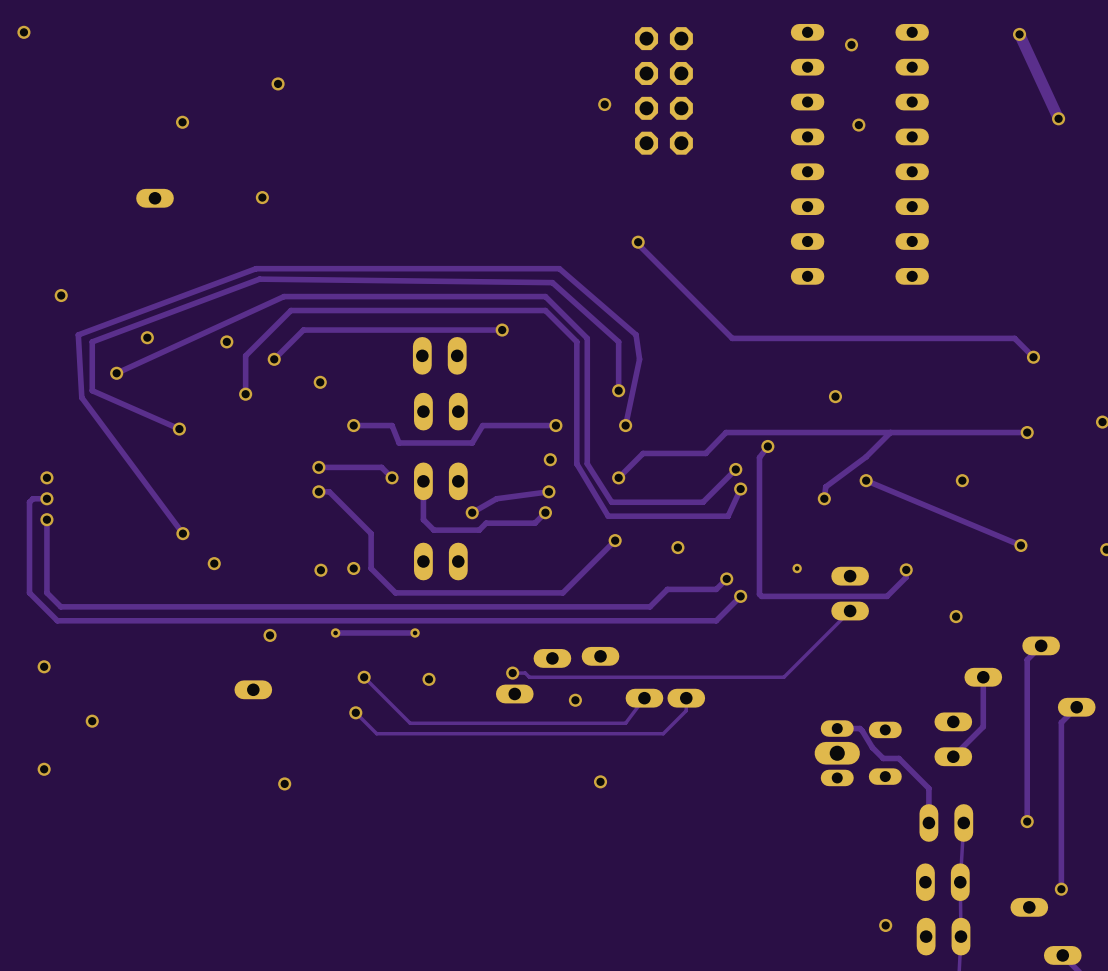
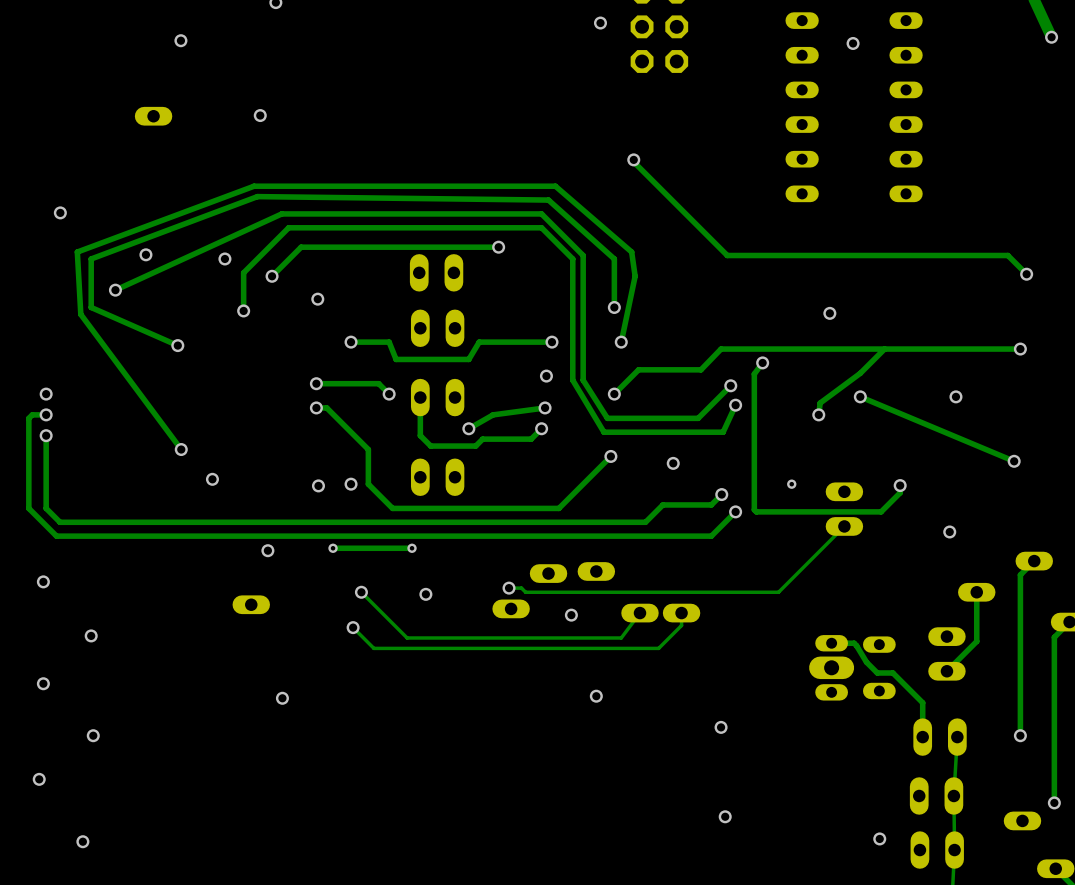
via: none -> (721, 727)
via: none -> (93, 735)
via: none -> (39, 779)
via: none -> (725, 816)
via: none -> (82, 841)

